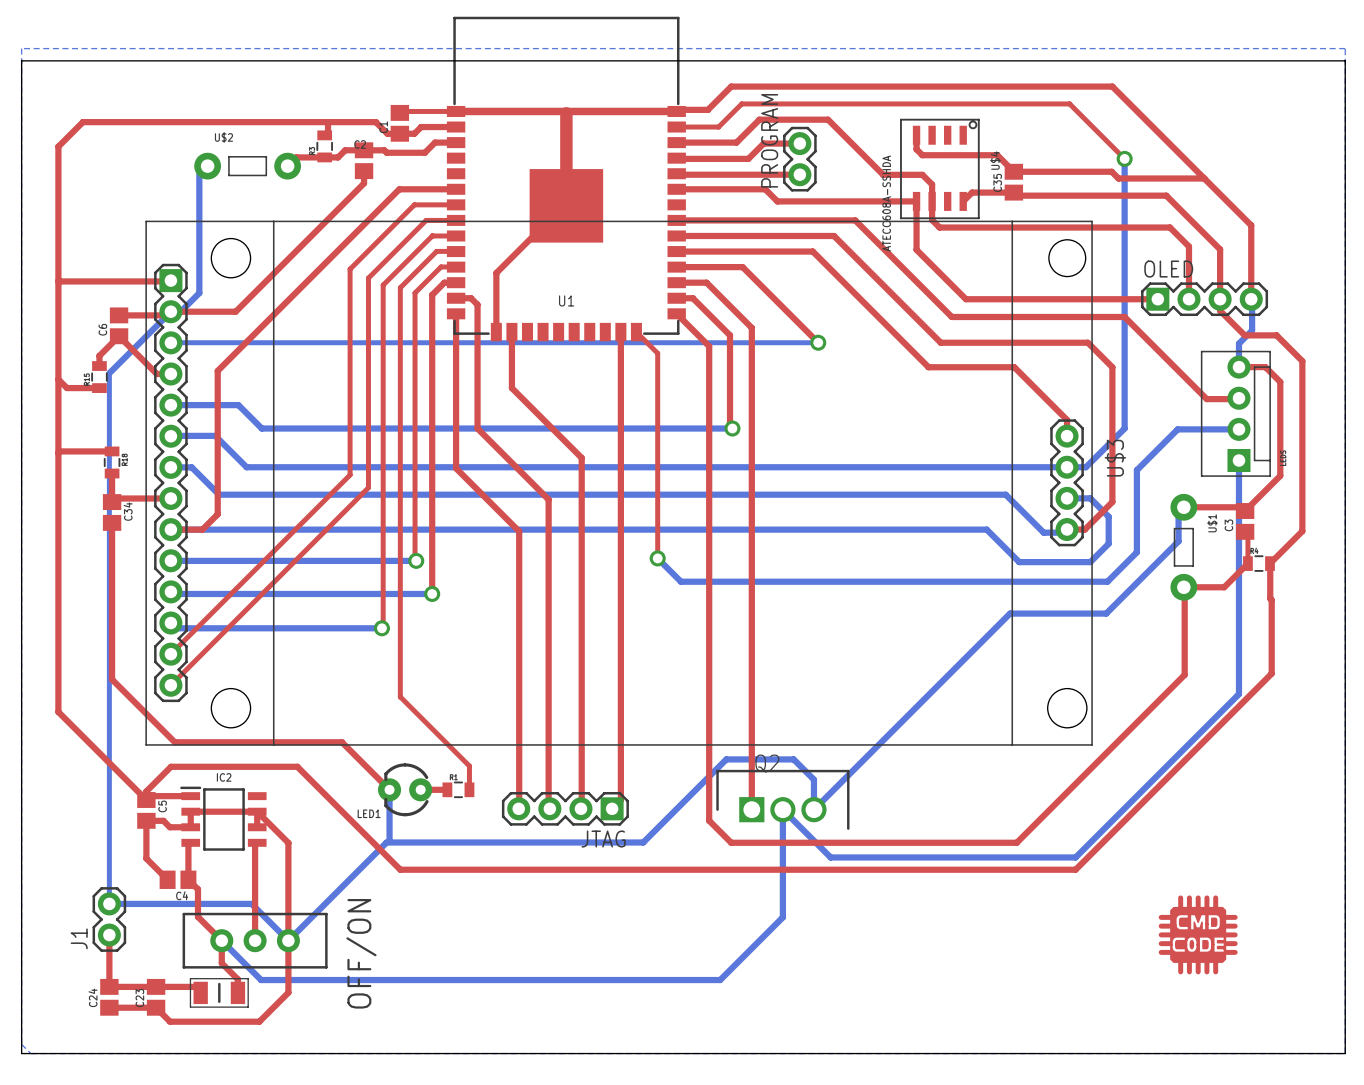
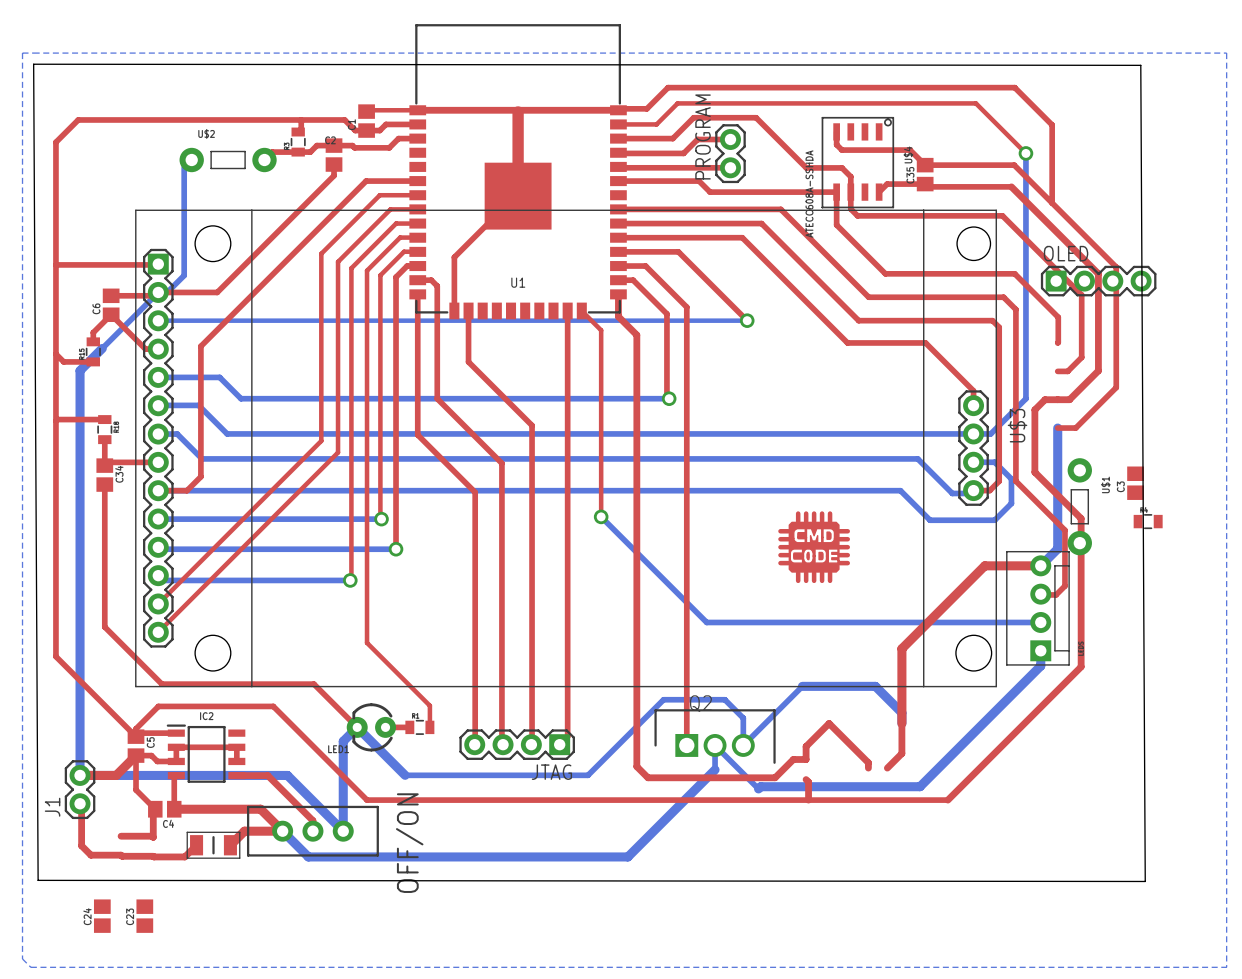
board edge: (21, 60) (1345, 60) (1345, 1053) (21, 1053) (21, 60) -> (33, 64) (38, 880) (1145, 881) (1140, 65) (33, 64)
top track: (1153, 127) (1251, 225) (1251, 299) -> (1052, 124) (1052, 203)
top track: (1118, 178) (1204, 178) -> (1020, 171) (1116, 267) (1116, 387) (1075, 428) (1057, 428)
top track: (1108, 195) (1166, 195) (1220, 249) (1220, 310) (1244, 335) (1276, 335) (1302, 361) (1302, 531) (1270, 563) -> (1011, 186) (1098, 273) (1098, 370) (1069, 399) (1045, 399) (1034, 409) (1034, 472) (1081, 518) (1081, 666) (947, 800)
top track: (1098, 227) (1169, 227) (1188, 246) (1188, 299) -> (1002, 215) (1081, 295) (1081, 357) (1067, 371) (1057, 371)
top track: (916, 237) (916, 249) (965, 299) (1157, 299) -> (836, 225) (885, 273) (1014, 273) (1058, 317) (1057, 343)
bottom track: (1251, 299) (1252, 330) (1238, 343) (1238, 367) -> none
top track: (676, 313) (709, 346) (709, 820) (731, 842) (1016, 842) (1184, 674) (1183, 587) (1224, 587) (1247, 563) (1247, 534) (1245, 531) -> (618, 294) (618, 316) (636, 335) (636, 766) (647, 777) (775, 777) (793, 759) (806, 759) (806, 746) (829, 723) (868, 762) (868, 768)
top track: (1100, 316) (1124, 316) (1206, 399) (1238, 398) -> (1003, 297) (1015, 309) (1015, 481) (1064, 530) (1064, 586) (1056, 594) (1040, 594)
top track: (1095, 350) (1112, 367) (1112, 502) (1095, 519) -> (999, 327) (999, 481)
top track: (1238, 367) (1265, 367) (1280, 381) (1280, 475) (1245, 511) (1241, 507) (1183, 507) -> none
bottom track: (109, 373) (109, 903) (251, 903) (288, 940) (386, 842) -> (102, 348) (80, 370) (80, 775) (287, 775) (343, 831) (343, 741) (357, 727) (405, 775)
part position: (1235, 413) -> (1037, 608)
bottom track: (1238, 429) (1177, 429) (1136, 470) (1136, 552) (1107, 581) (680, 581) -> (1040, 622) (706, 622) (622, 538)
bottom track: none -> (1057, 428) (1057, 548) (1040, 565)
bottom track: (1238, 460) (1238, 694) (1075, 857) (830, 857) -> (1040, 650) (1040, 665) (920, 786) (760, 786) (758, 788)
bottom track: (1183, 507) (1178, 512) (1178, 541) (1106, 613) (1010, 613) (878, 744) -> (901, 723) (901, 712) (875, 686) (802, 686)
drawing: none -> [778, 511, 851, 584]
top track: (1270, 563) (1271, 673) (1075, 869) (1038, 869) -> none
top track: none -> (1040, 565) (984, 565) (901, 648) (901, 753) (887, 768)
bottom track: (389, 789) (389, 839) (386, 842) -> none
top track: (257, 811) (288, 842) (288, 992) (259, 1021) (170, 1021) (156, 1007) (109, 1007) -> none
top track: none -> (136, 755) (116, 775) (80, 775)
bottom track: (782, 836) (782, 917) (720, 980) (261, 980) (221, 940) -> (715, 769) (627, 856) (308, 856) (282, 831)
top track: (257, 842) (255, 844) (255, 940) -> (236, 775) (267, 775) (312, 820) (312, 831)
bottom track: (386, 842) (442, 842) -> none
top track: none -> (806, 779) (808, 782) (808, 800)
top track: none -> (80, 803) (81, 805) (81, 845) (90, 855) (184, 856) (196, 845)
top track: none -> (155, 809) (153, 811) (153, 837) (121, 836)
top track: (188, 879) (197, 889) (197, 916) (221, 940) (221, 963) (237, 979) (237, 992) -> (174, 809) (260, 809) (282, 831) (244, 831) (230, 845)
drawing: [1158, 895, 1238, 975] -> none
J1 position: (109, 919) -> (80, 789)
top track: (109, 935) (109, 986) (194, 986) (200, 992) -> none
OFF/ON position: (255, 940) -> (312, 831)
part position: (219, 992) -> (213, 845)

